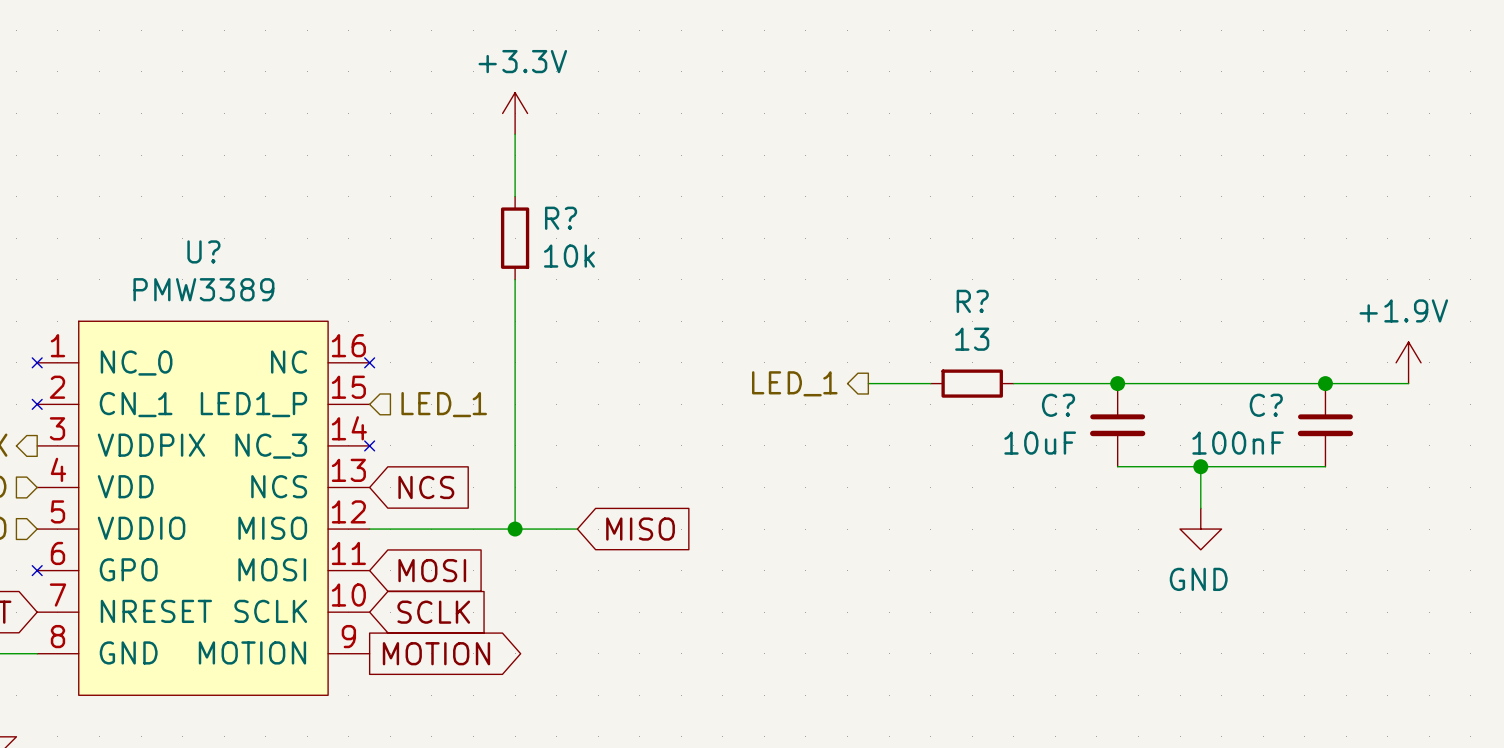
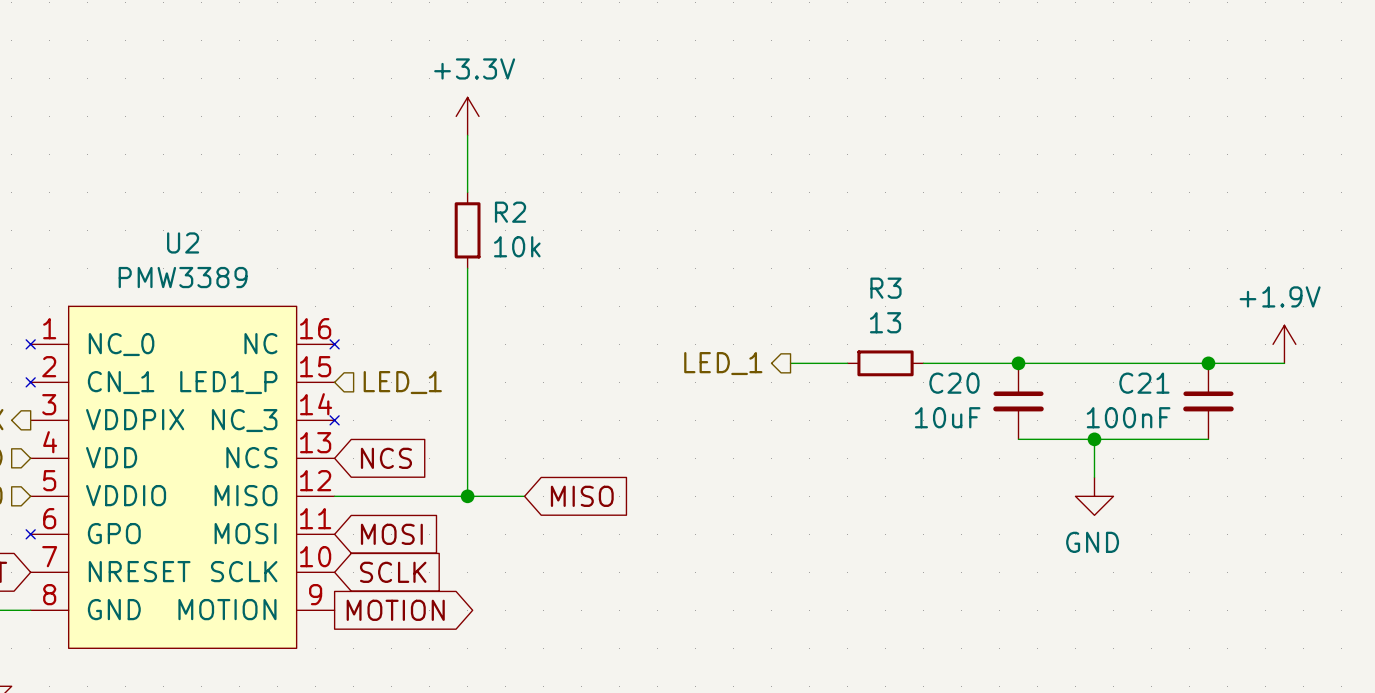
R? name: R? (561, 218) -> R2 (510, 212)
U? name: U? (203, 251) -> U2 (183, 242)
R? name: R? (972, 301) -> R3 (885, 288)
C? name: C? (1058, 405) -> C20 (954, 383)
C? name: C? (1266, 405) -> C21 (1144, 383)

